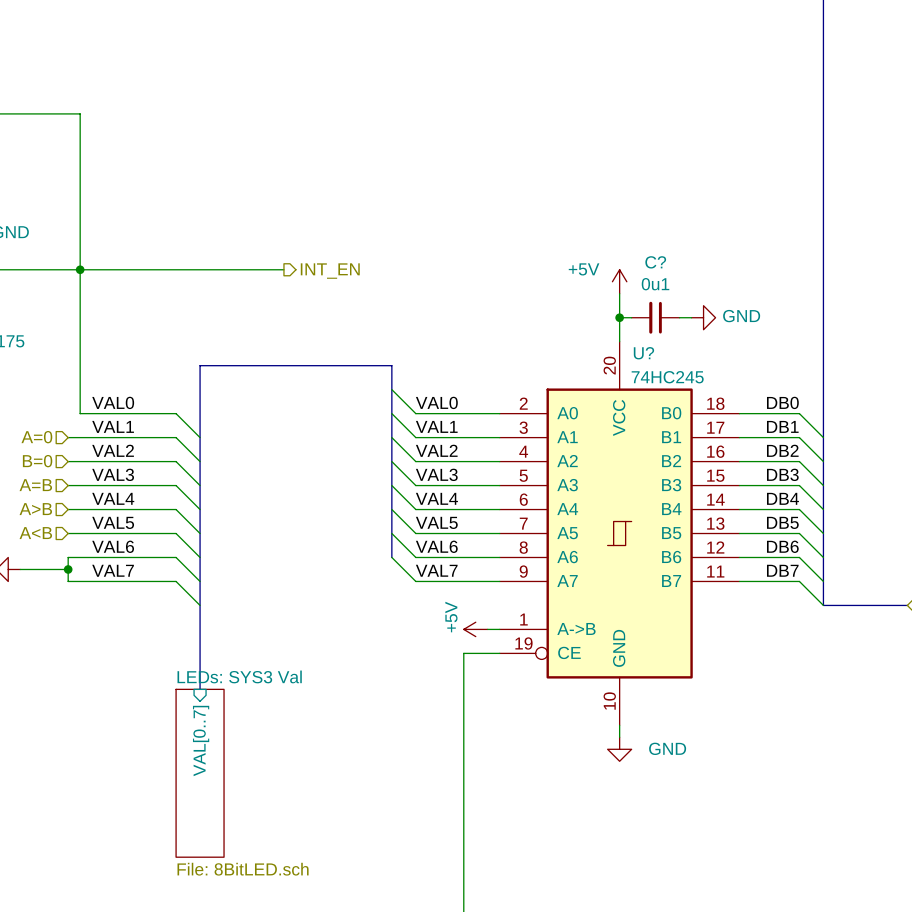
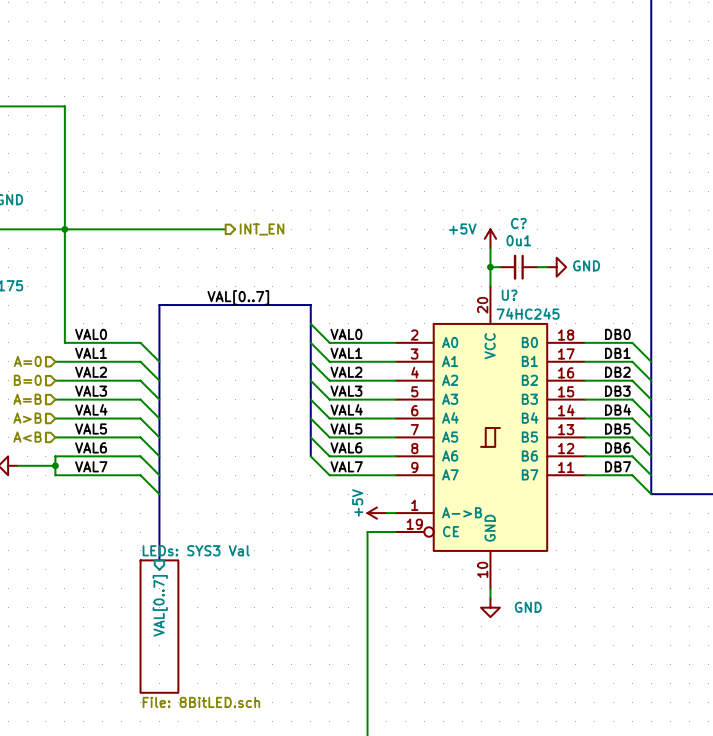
label: none -> VAL[0..7] (238, 297)

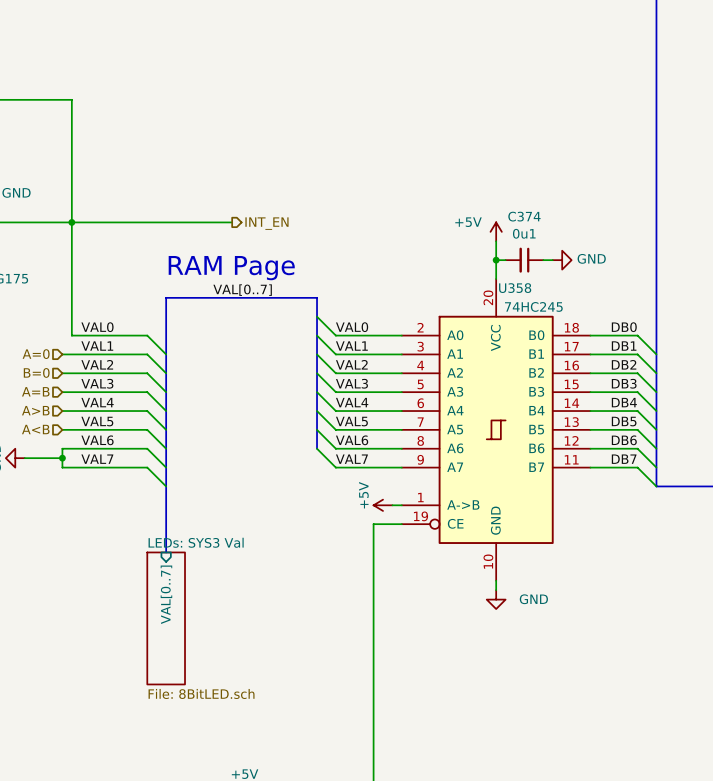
C? name: C? (518, 223) -> C374 (524, 216)
text: none -> RAM Page (231, 268)
U? name: U? (509, 295) -> U358 (515, 288)

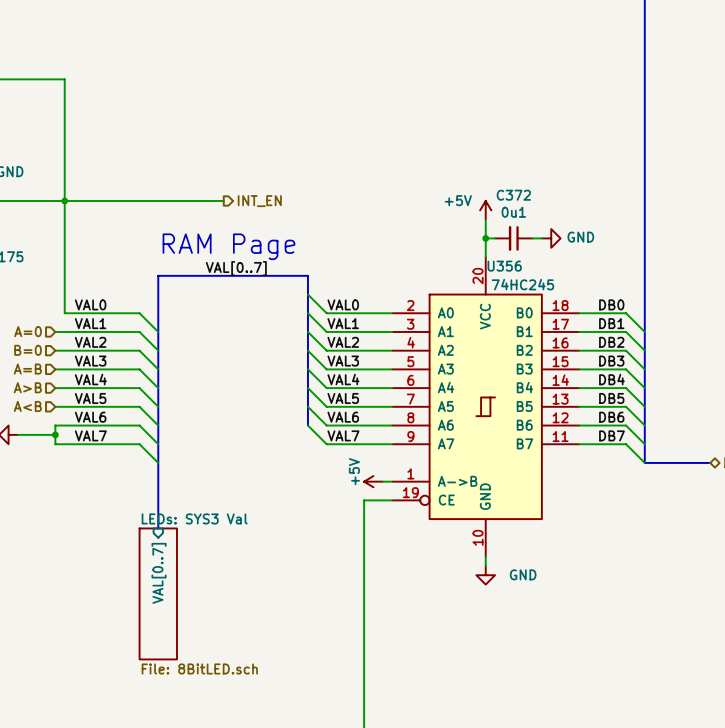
C374 name: C374 (524, 216) -> C372 (513, 195)
U358 name: U358 (515, 288) -> U356 (504, 266)

